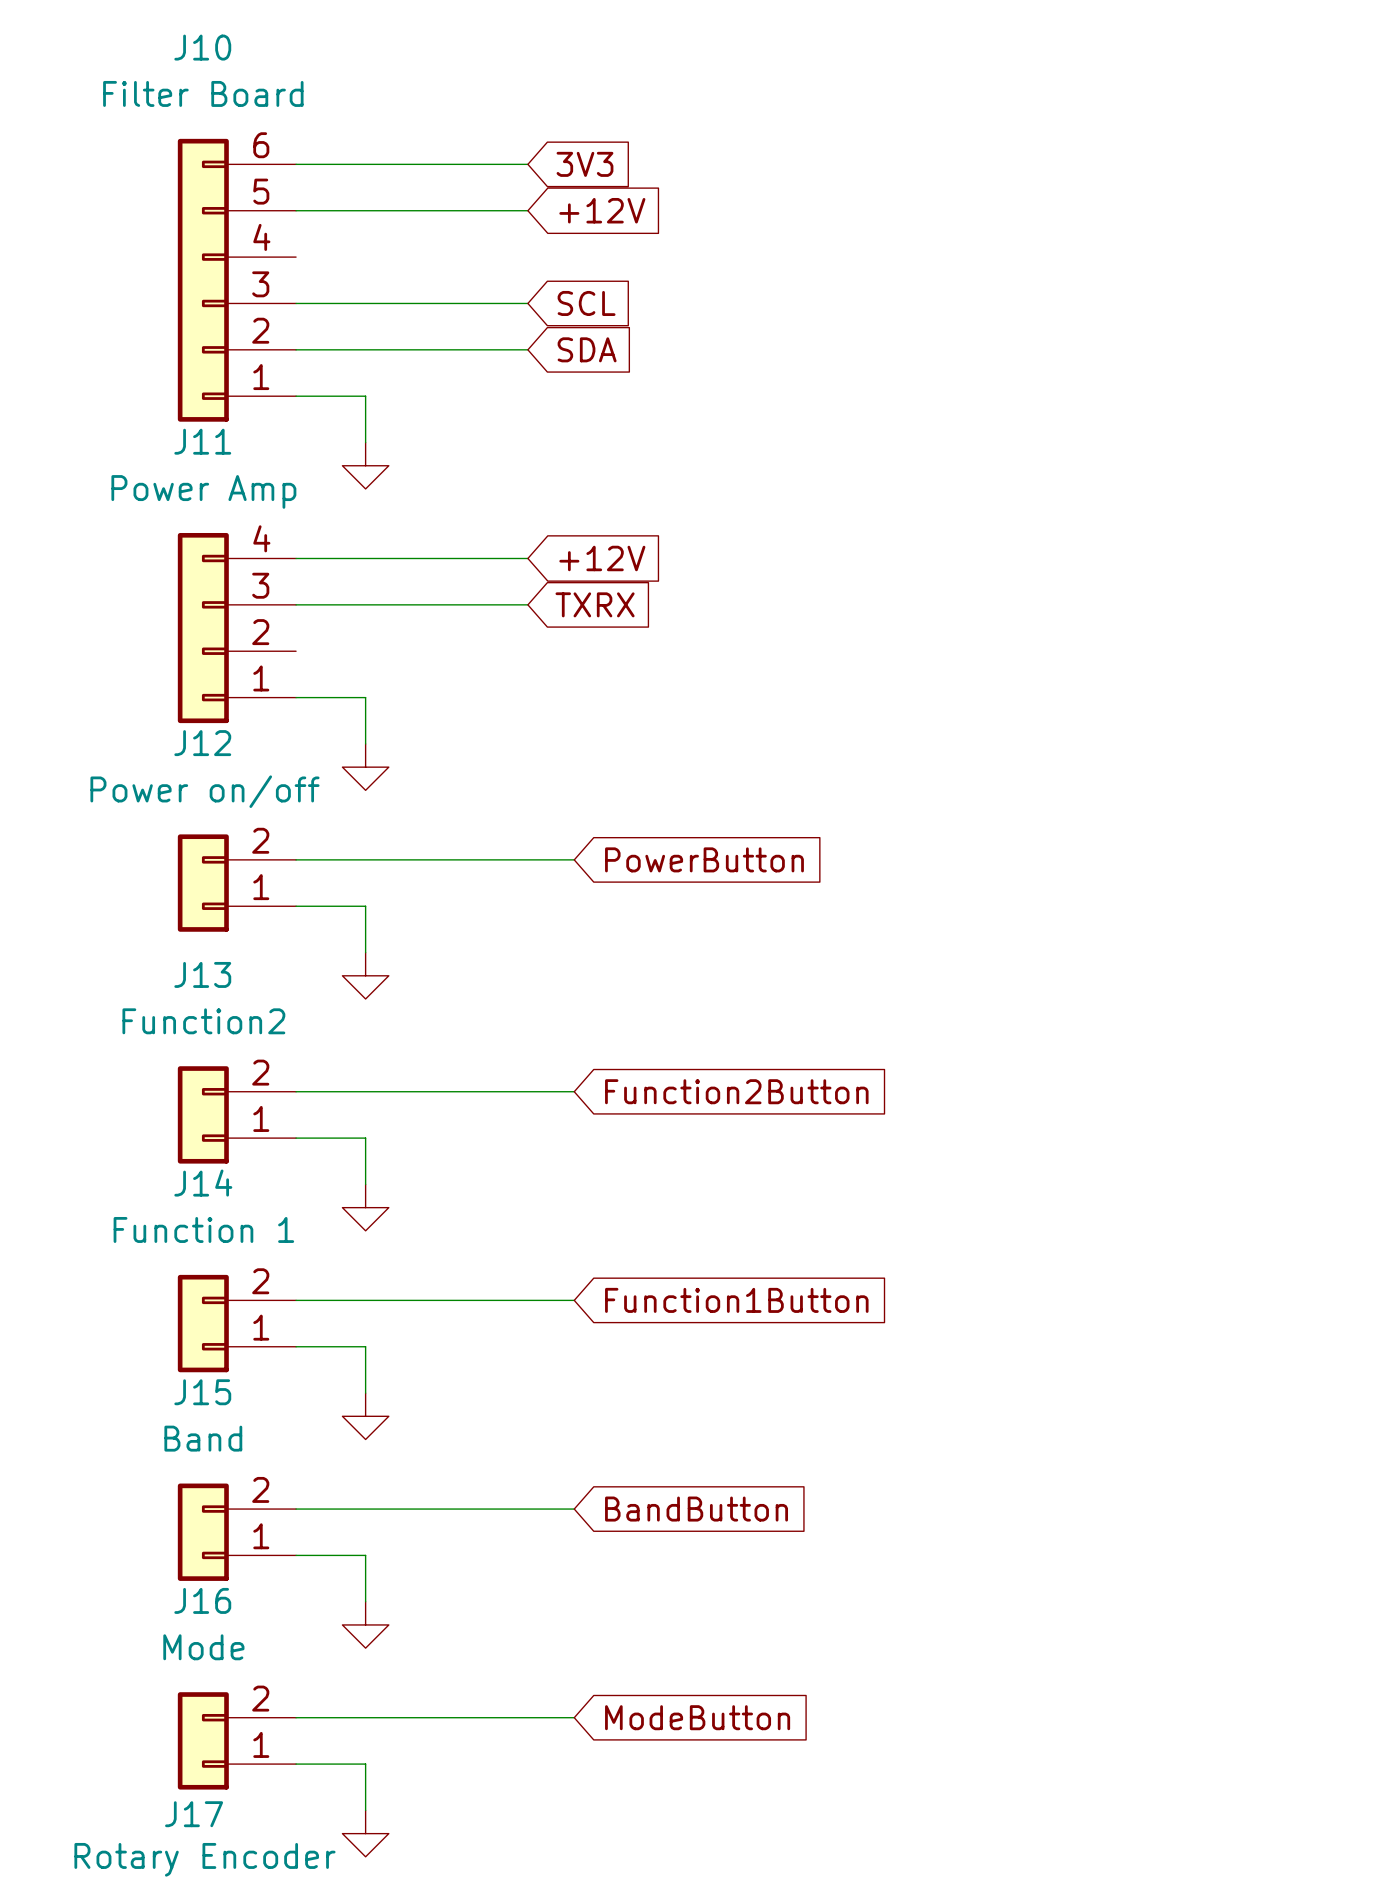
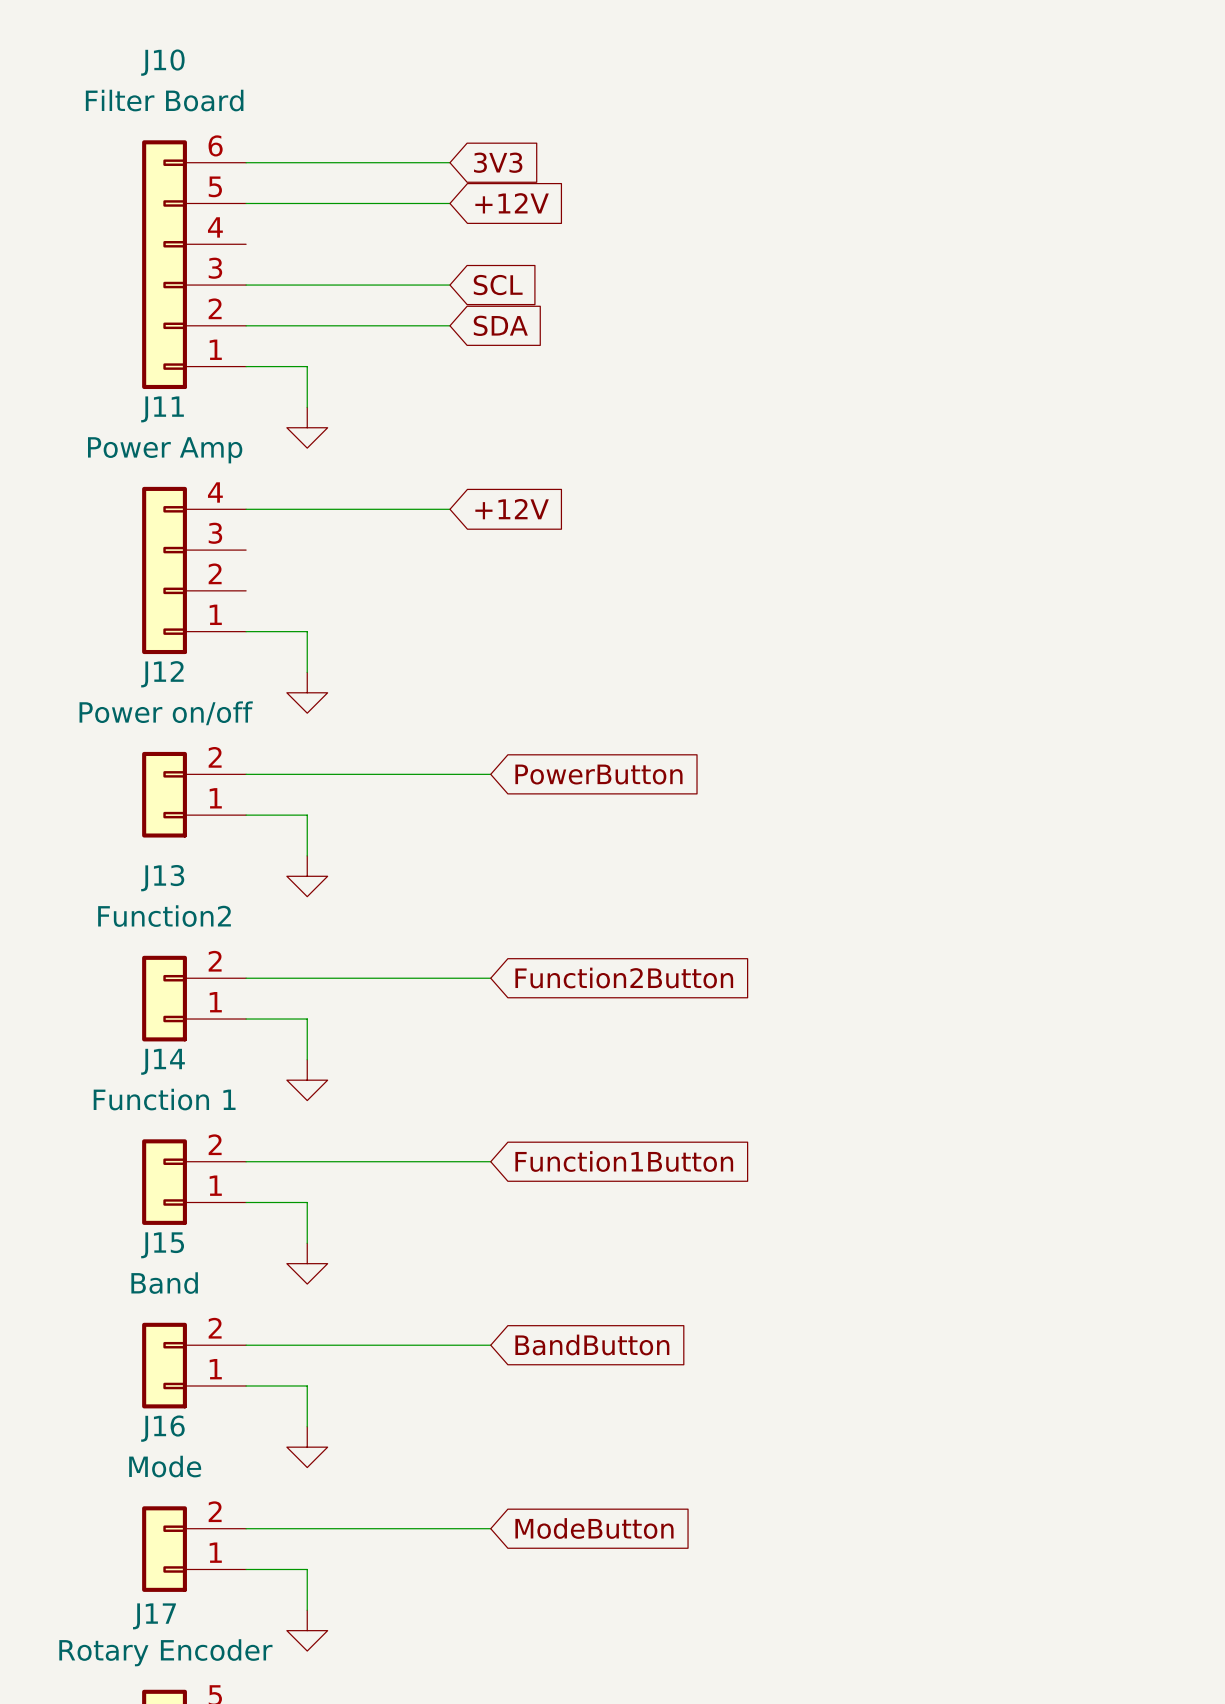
wire: (296, 604) (527, 604) -> none
global label: TXRX (595, 604) -> none

